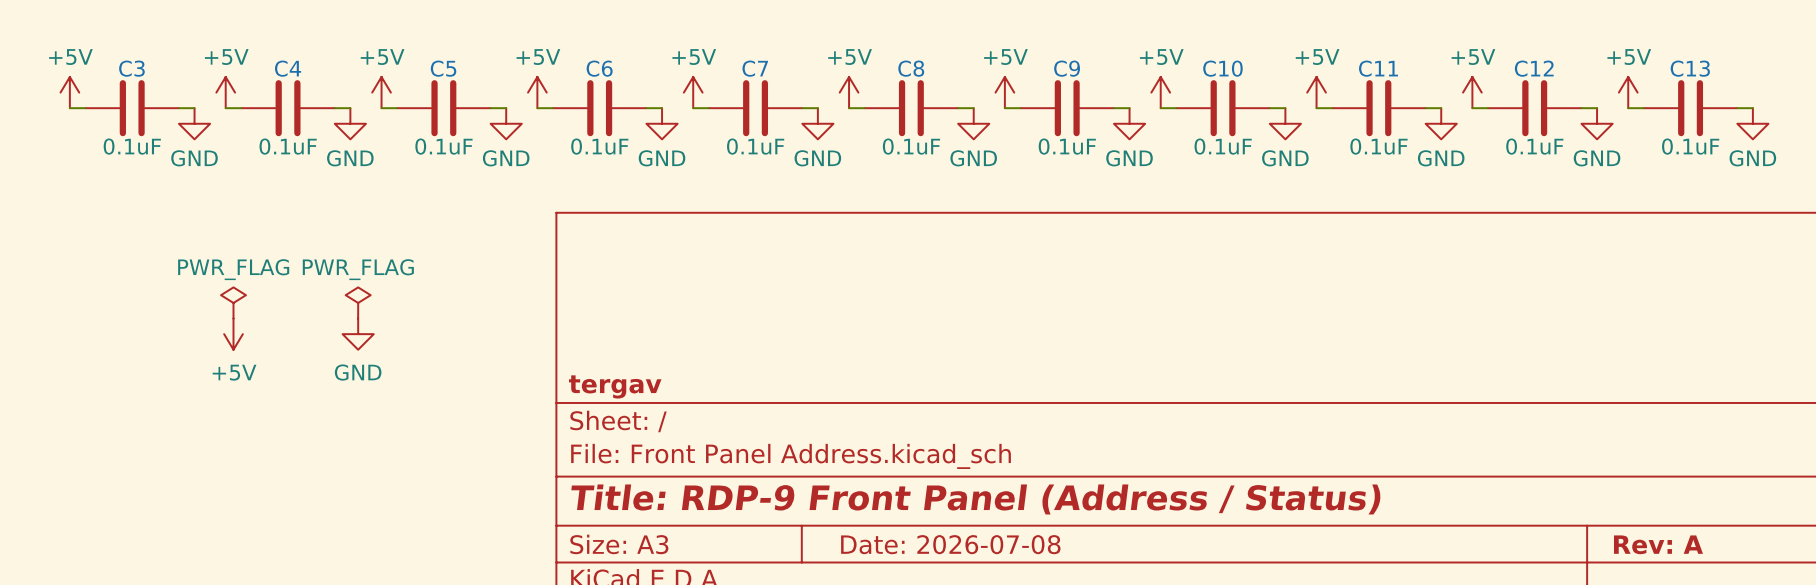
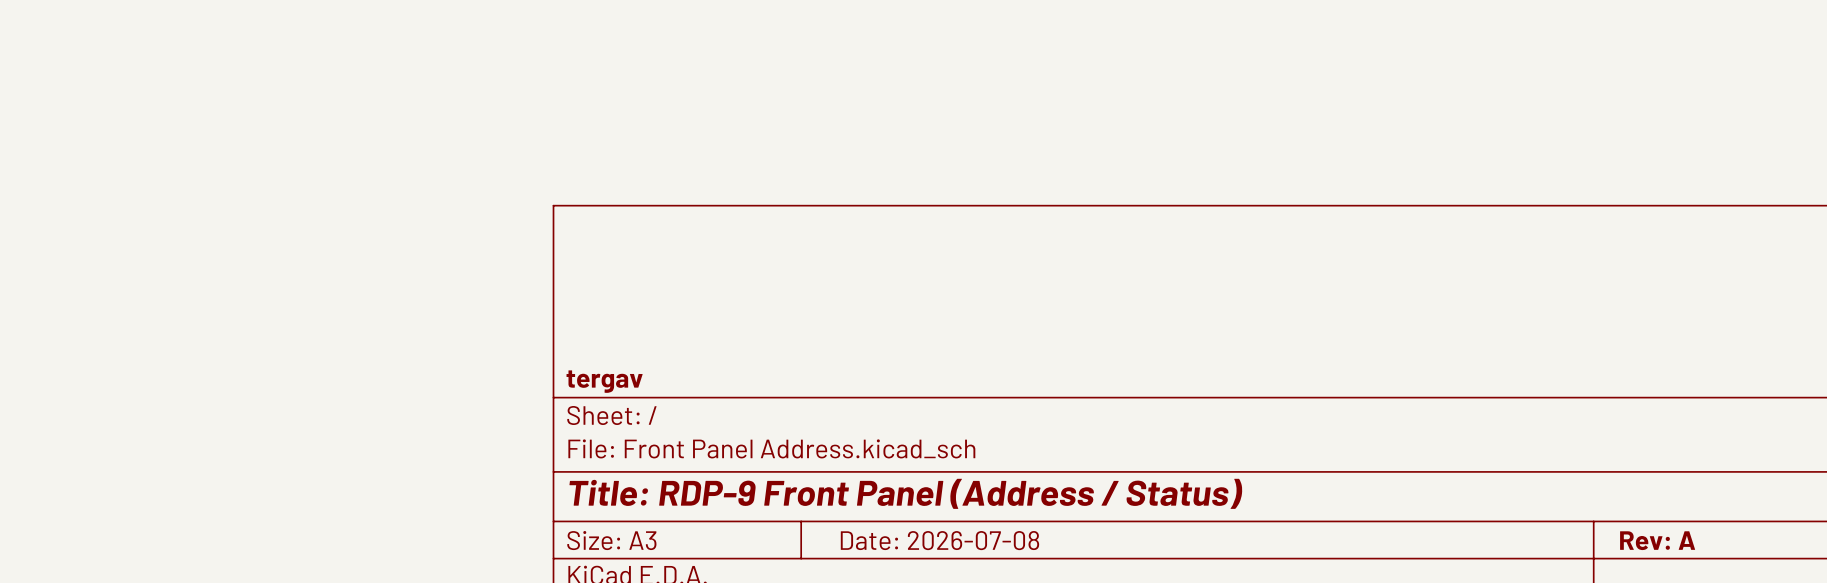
power symbol: +5V (69, 92) -> none
power symbol: +5V (225, 92) -> none
power symbol: +5V (381, 92) -> none
power symbol: +5V (537, 92) -> none
power symbol: +5V (693, 92) -> none
power symbol: +5V (849, 92) -> none
power symbol: +5V (1004, 92) -> none
power symbol: +5V (1160, 92) -> none
power symbol: +5V (1316, 92) -> none
power symbol: +5V (1472, 92) -> none
power symbol: +5V (1628, 92) -> none
wire: (69, 108) (85, 108) -> none
C3: 0.1uF (132, 108) -> none
wire: (178, 108) (194, 108) -> none
wire: (225, 108) (241, 108) -> none
C4: 0.1uF (288, 108) -> none
wire: (334, 108) (350, 108) -> none
wire: (381, 108) (397, 108) -> none
C5: 0.1uF (443, 108) -> none
wire: (490, 108) (506, 108) -> none
wire: (537, 108) (552, 108) -> none
C6: 0.1uF (599, 108) -> none
wire: (646, 108) (662, 108) -> none
wire: (693, 108) (708, 108) -> none
C7: 0.1uF (755, 108) -> none
wire: (802, 108) (817, 108) -> none
wire: (849, 108) (864, 108) -> none
C8: 0.1uF (911, 108) -> none
wire: (958, 108) (973, 108) -> none
wire: (1004, 108) (1020, 108) -> none
C9: 0.1uF (1067, 108) -> none
wire: (1113, 108) (1129, 108) -> none
wire: (1160, 108) (1176, 108) -> none
C10: 0.1uF (1223, 108) -> none
wire: (1269, 108) (1285, 108) -> none
wire: (1316, 108) (1332, 108) -> none
C11: 0.1uF (1378, 108) -> none
wire: (1425, 108) (1441, 108) -> none
wire: (1472, 108) (1487, 108) -> none
C12: 0.1uF (1534, 108) -> none
wire: (1581, 108) (1597, 108) -> none
wire: (1628, 108) (1643, 108) -> none
C13: 0.1uF (1690, 108) -> none
wire: (1737, 108) (1752, 108) -> none
power symbol: GND (194, 123) -> none
power symbol: GND (350, 123) -> none
power symbol: GND (506, 123) -> none
power symbol: GND (662, 123) -> none
power symbol: GND (817, 123) -> none
power symbol: GND (973, 123) -> none
power symbol: GND (1129, 123) -> none
power symbol: GND (1285, 123) -> none
power symbol: GND (1441, 123) -> none
power symbol: GND (1597, 123) -> none
power symbol: GND (1752, 123) -> none
power symbol: PWR_FLAG (233, 302) -> none
power symbol: PWR_FLAG (358, 302) -> none
power symbol: +5V (233, 334) -> none
power symbol: GND (358, 334) -> none

